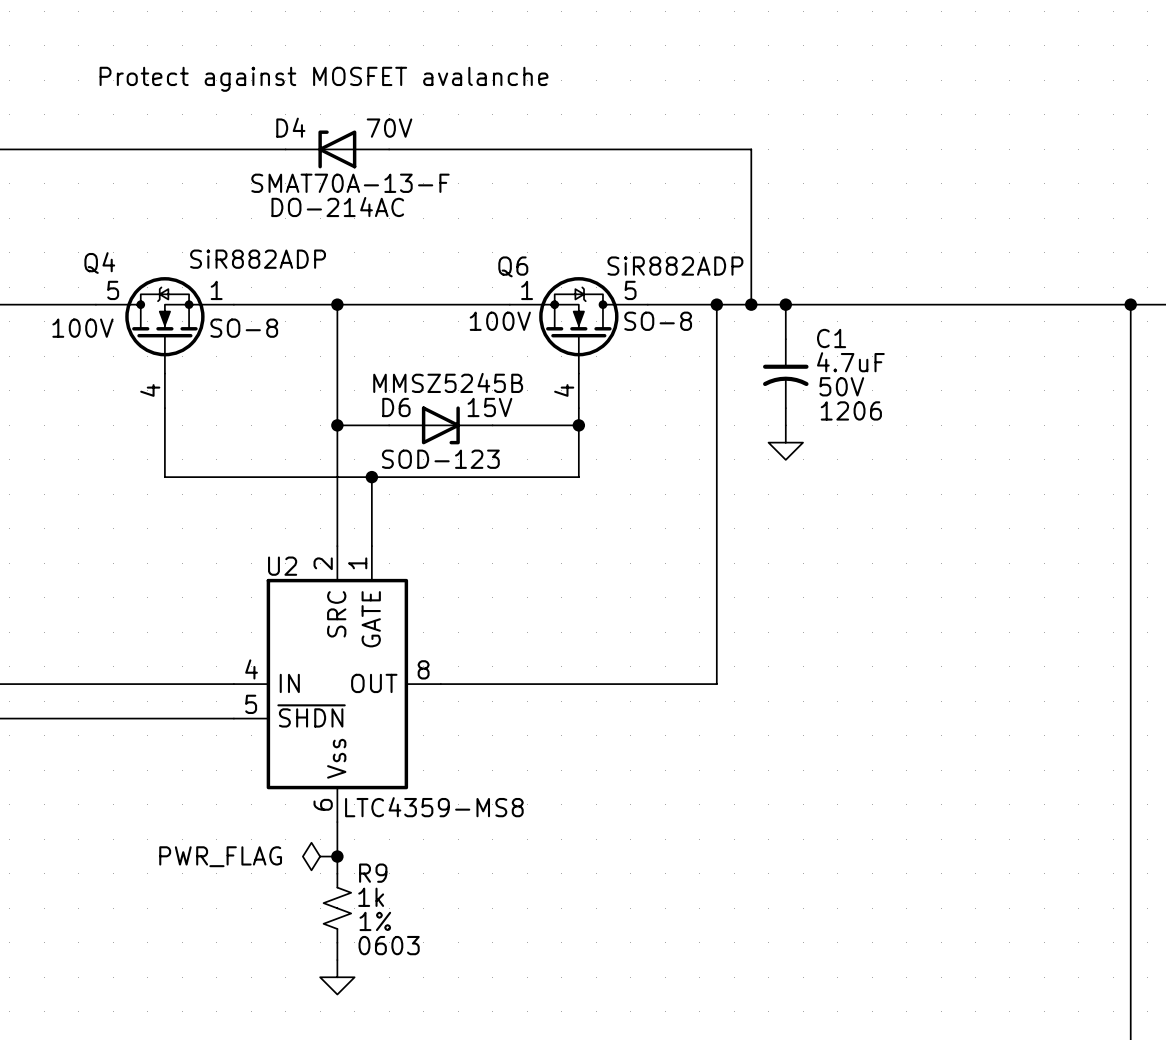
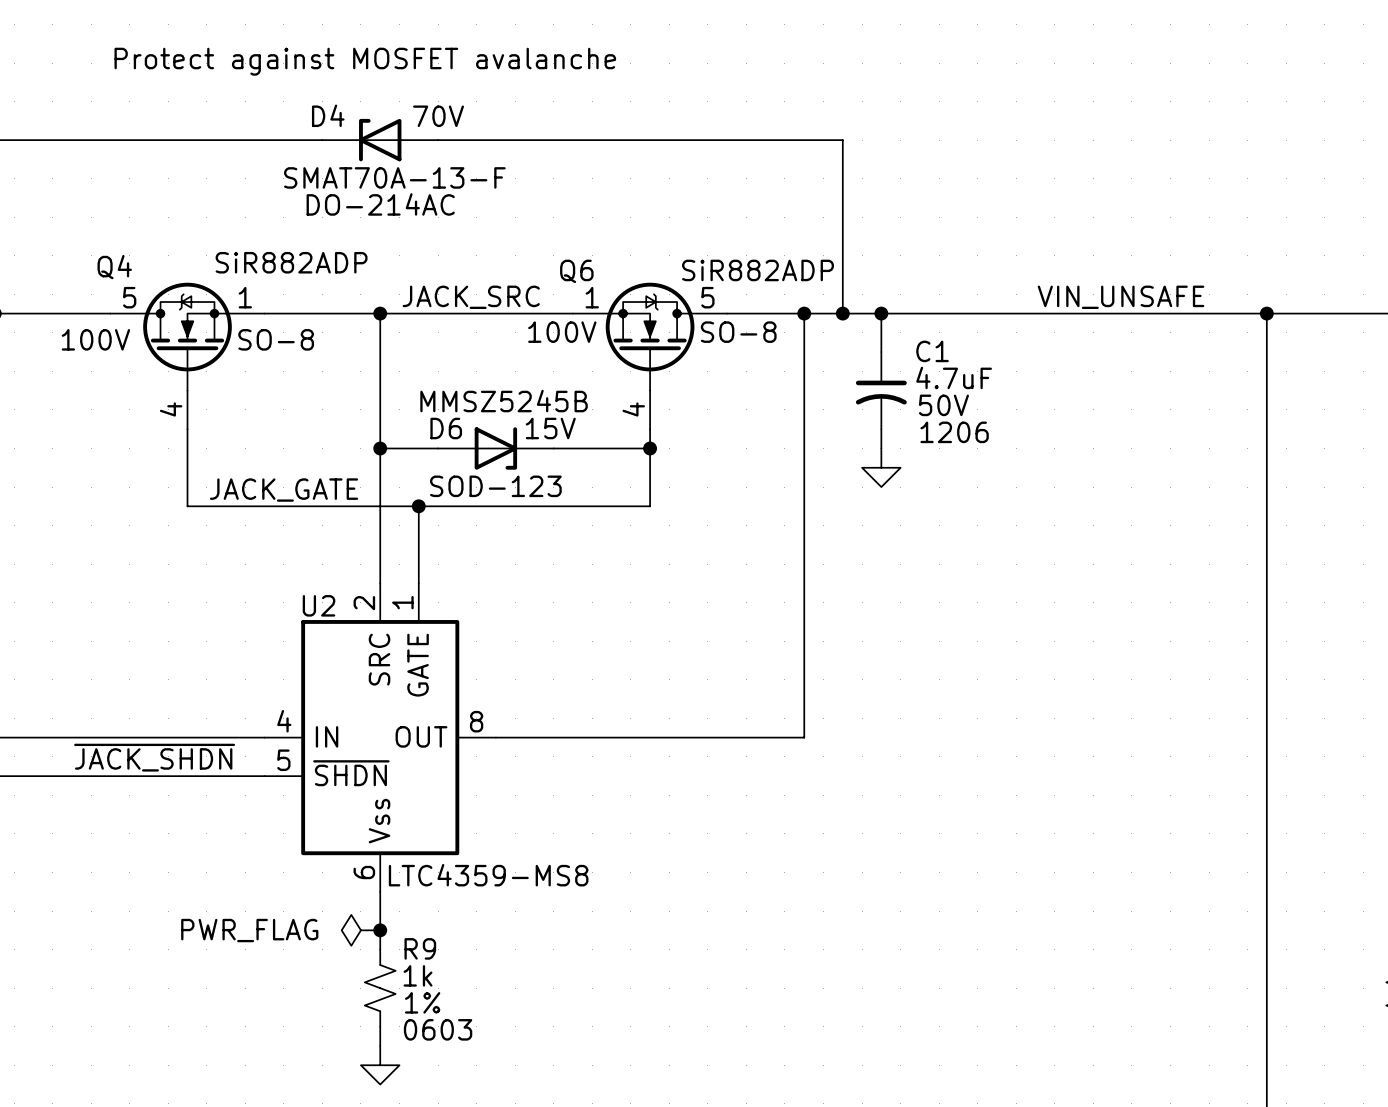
label: none -> JACK_SRC (471, 297)
label: none -> VIN_UNSAFE (1121, 297)
label: none -> JACK_GATE (284, 490)
label: none -> ~{JACK_SHDN} (154, 757)

